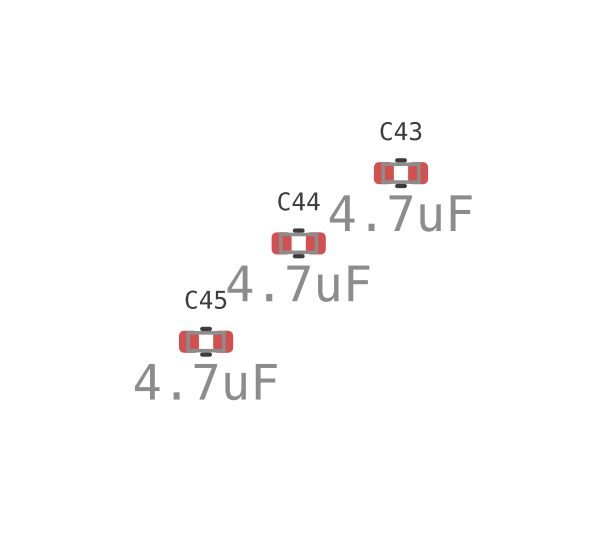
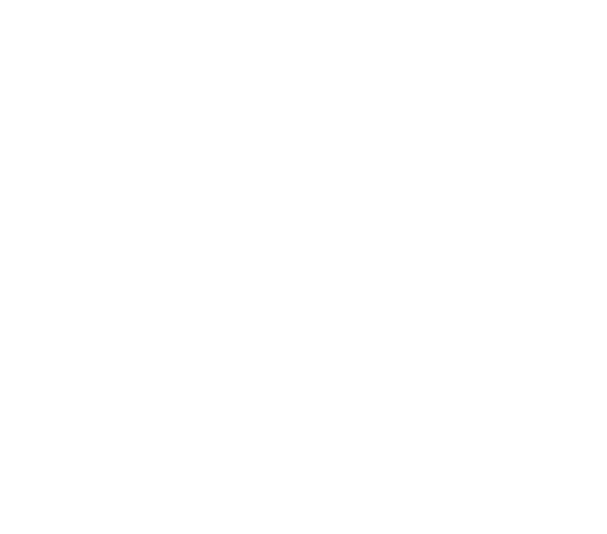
C43: 4.7uF (400, 173) -> none
C44: 4.7uF (298, 243) -> none
C45: 4.7uF (206, 341) -> none

